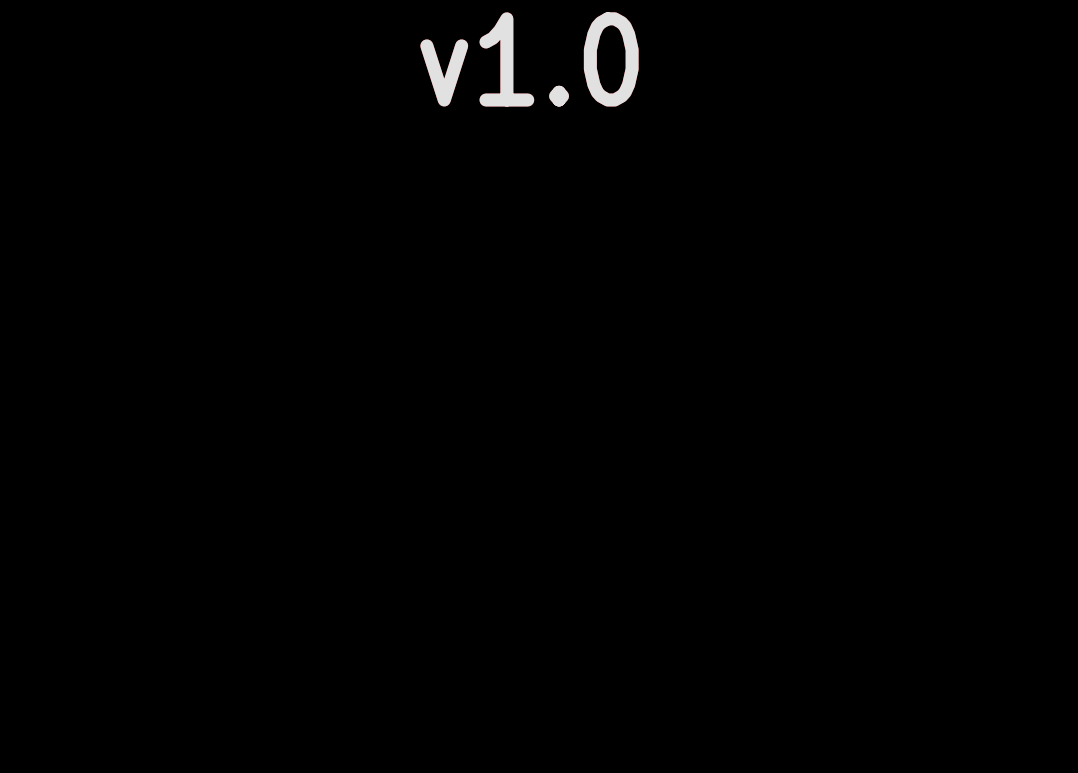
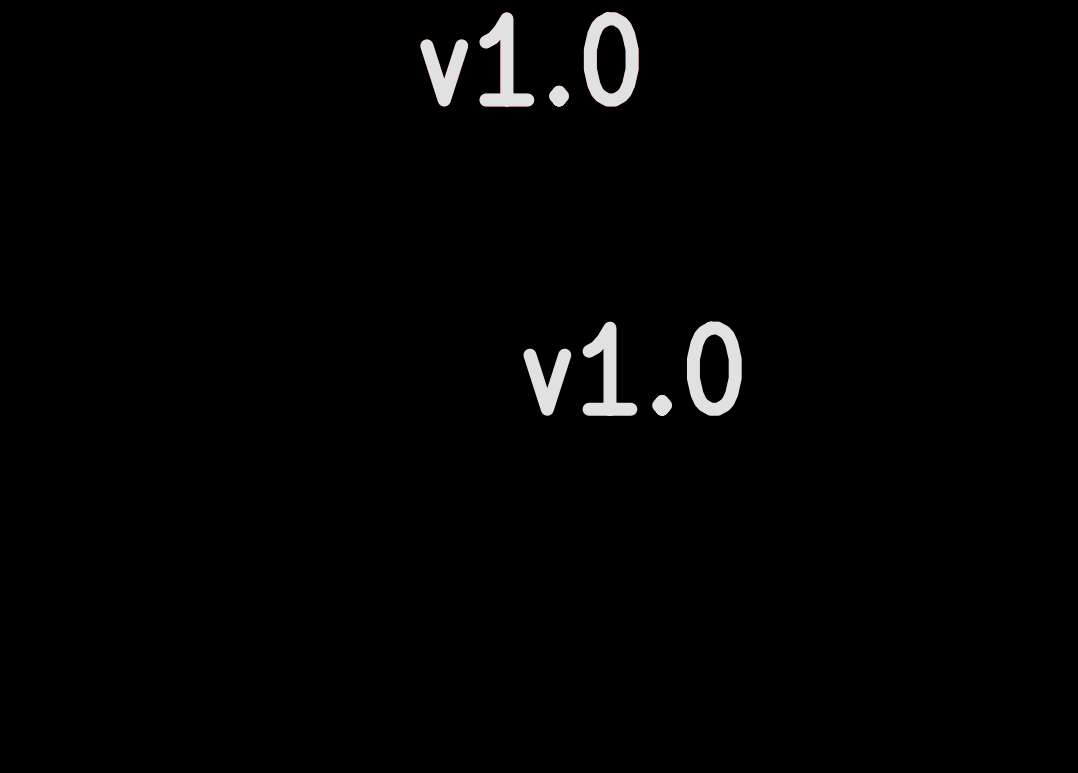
text: none -> v1.0 (632, 368)

